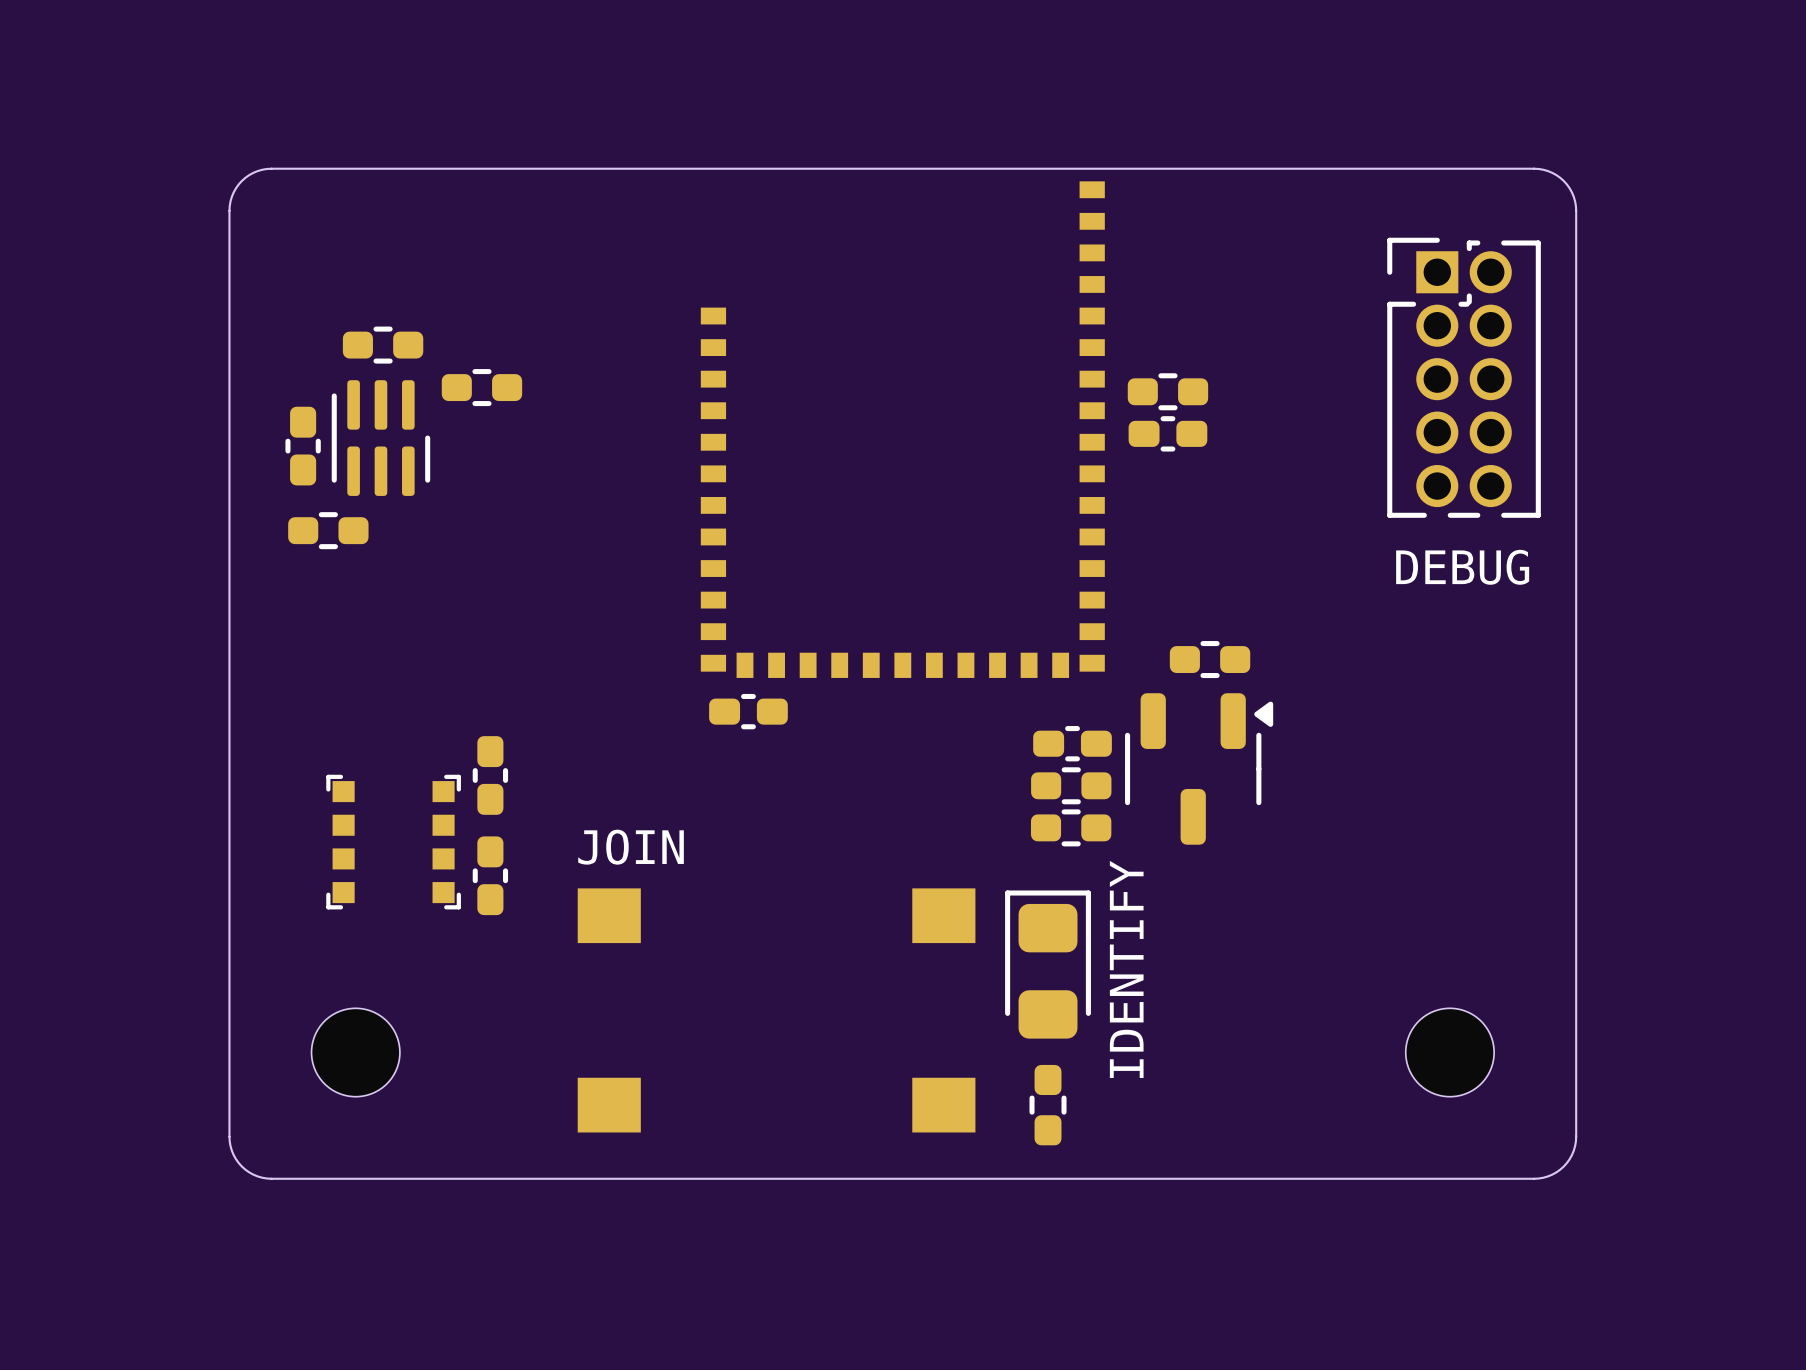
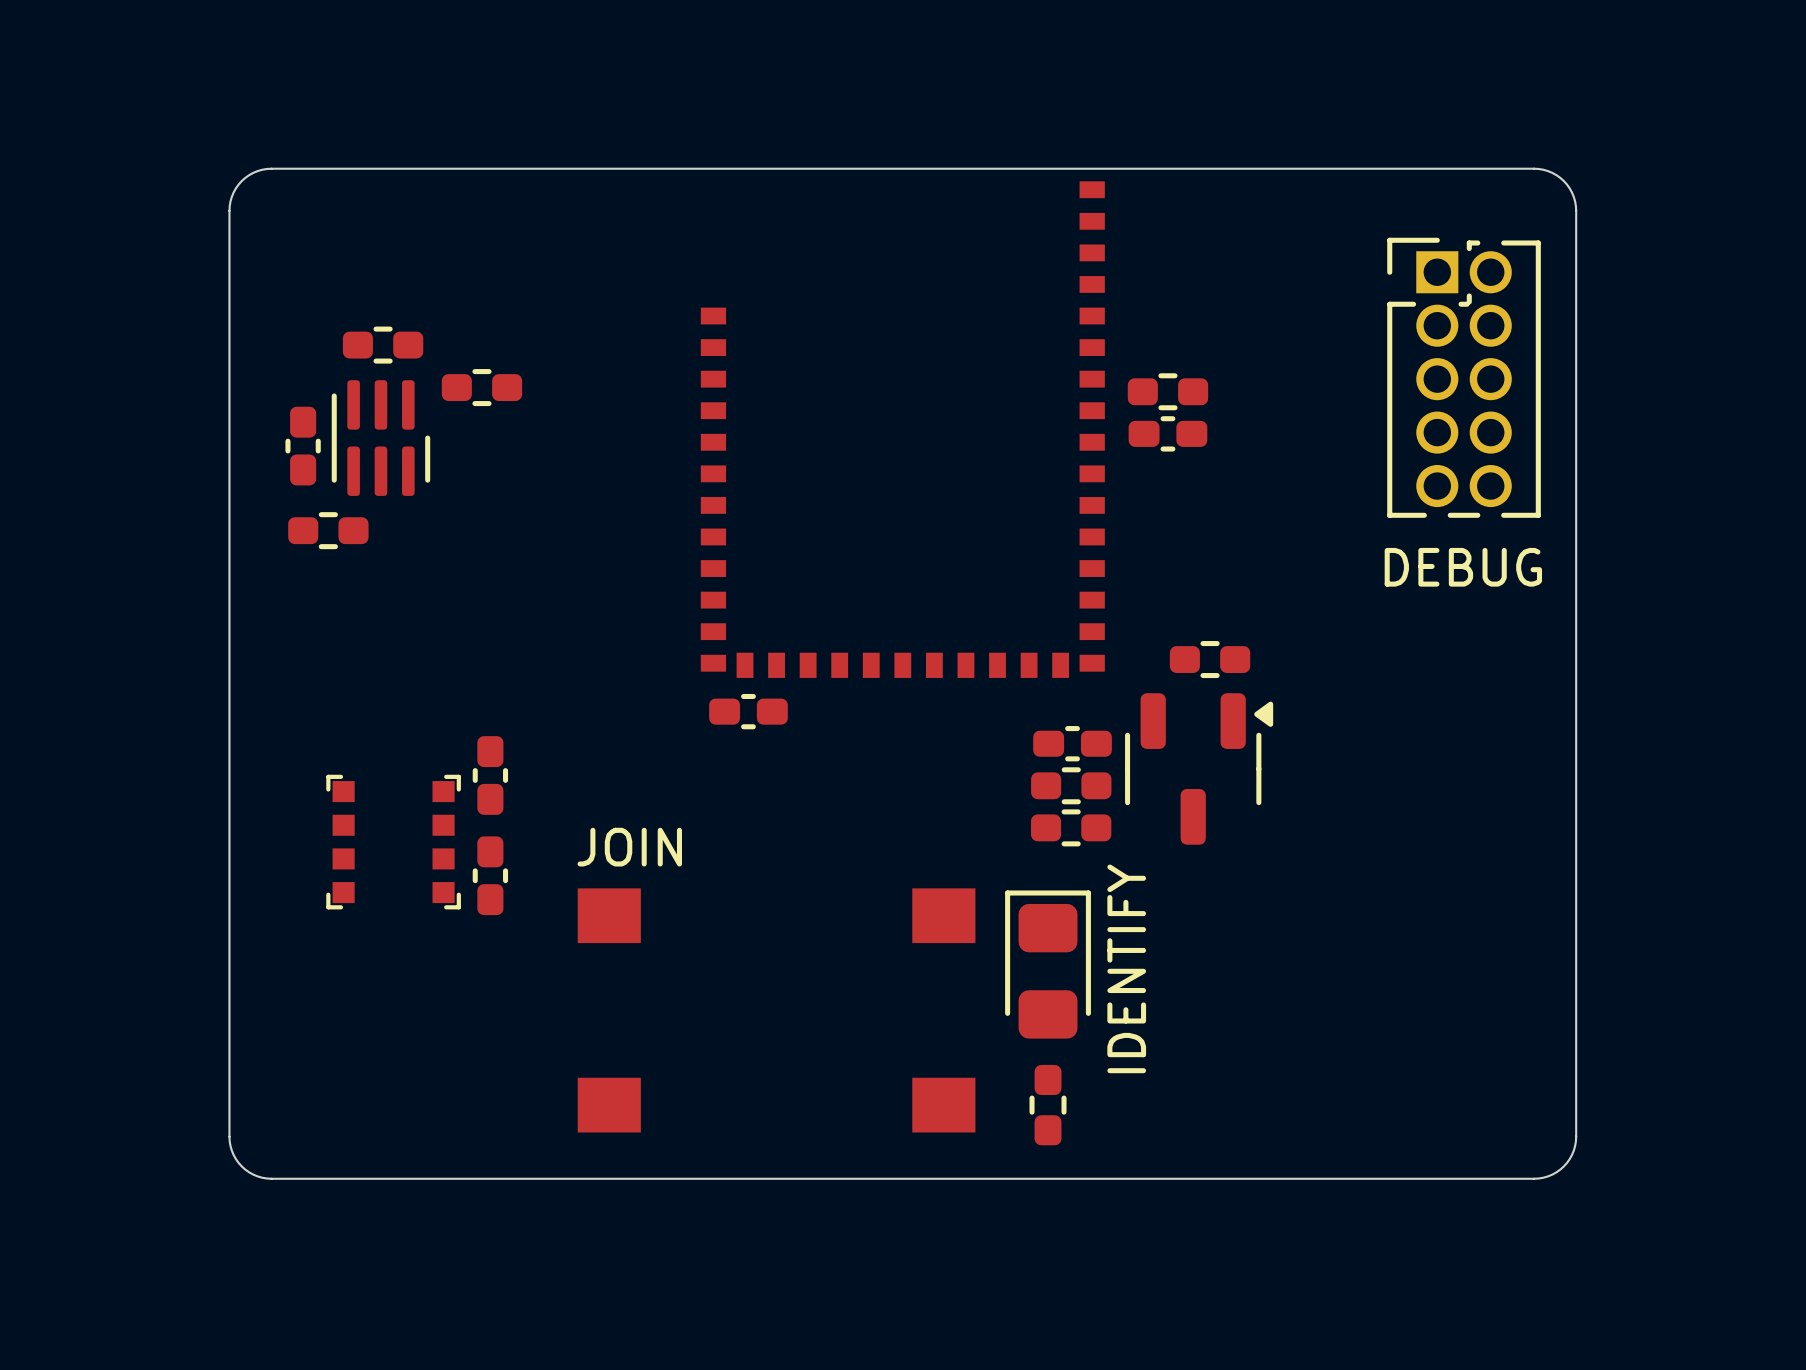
part: (355, 1052) -> none
part: (1449, 1052) -> none

